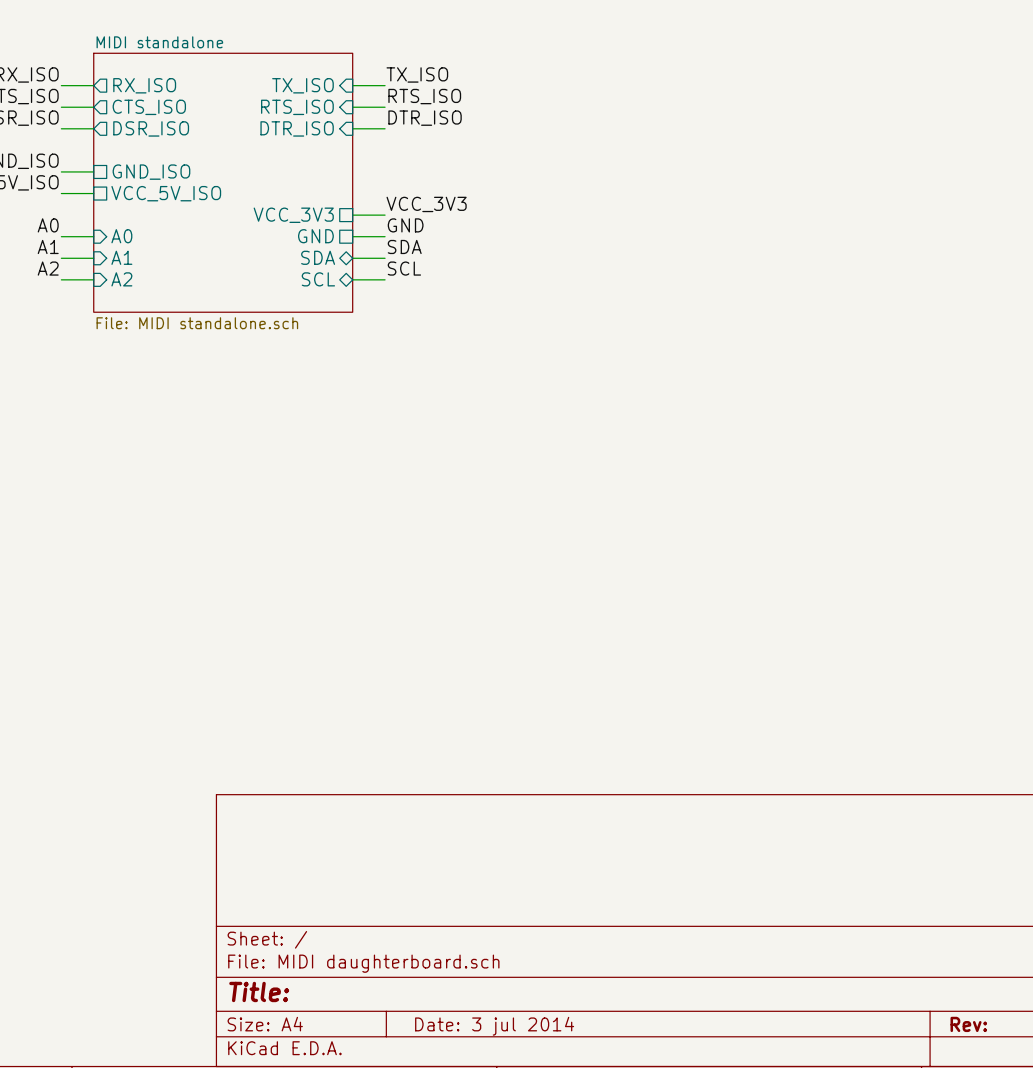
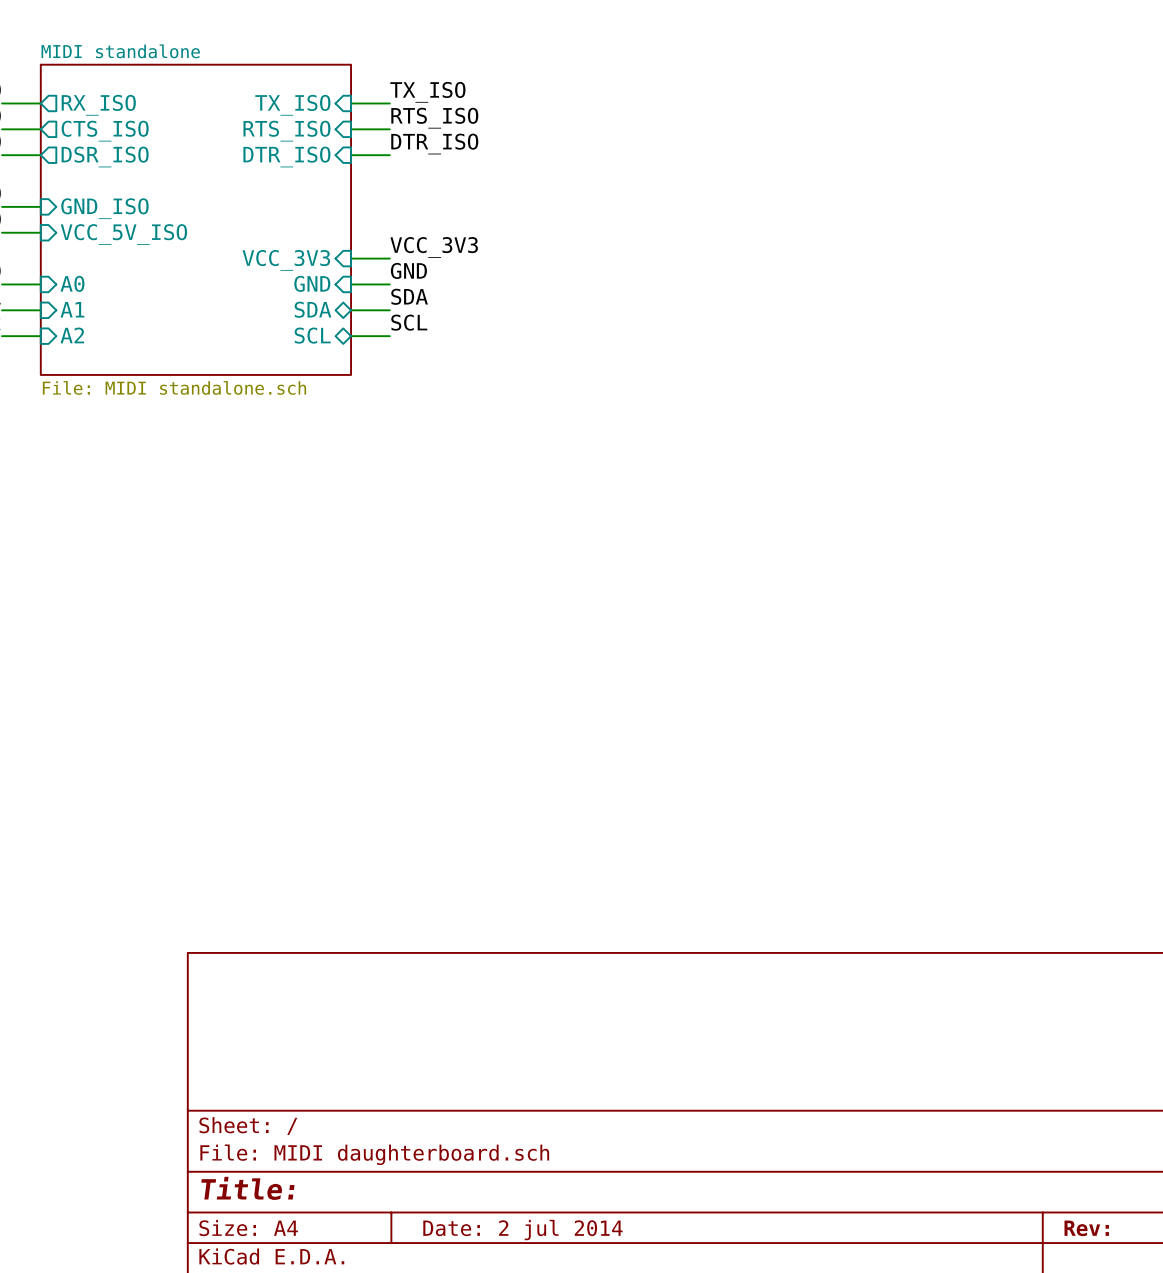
sheet pin shape: passive (151, 172) -> input (104, 208)
sheet pin shape: passive (166, 193) -> input (123, 234)
sheet pin shape: passive (293, 215) -> input (286, 260)
sheet pin shape: passive (315, 236) -> input (312, 283)
title block: Date: 3 jul 2014 (494, 1026) -> Date: 2 jul 2014 (522, 1230)

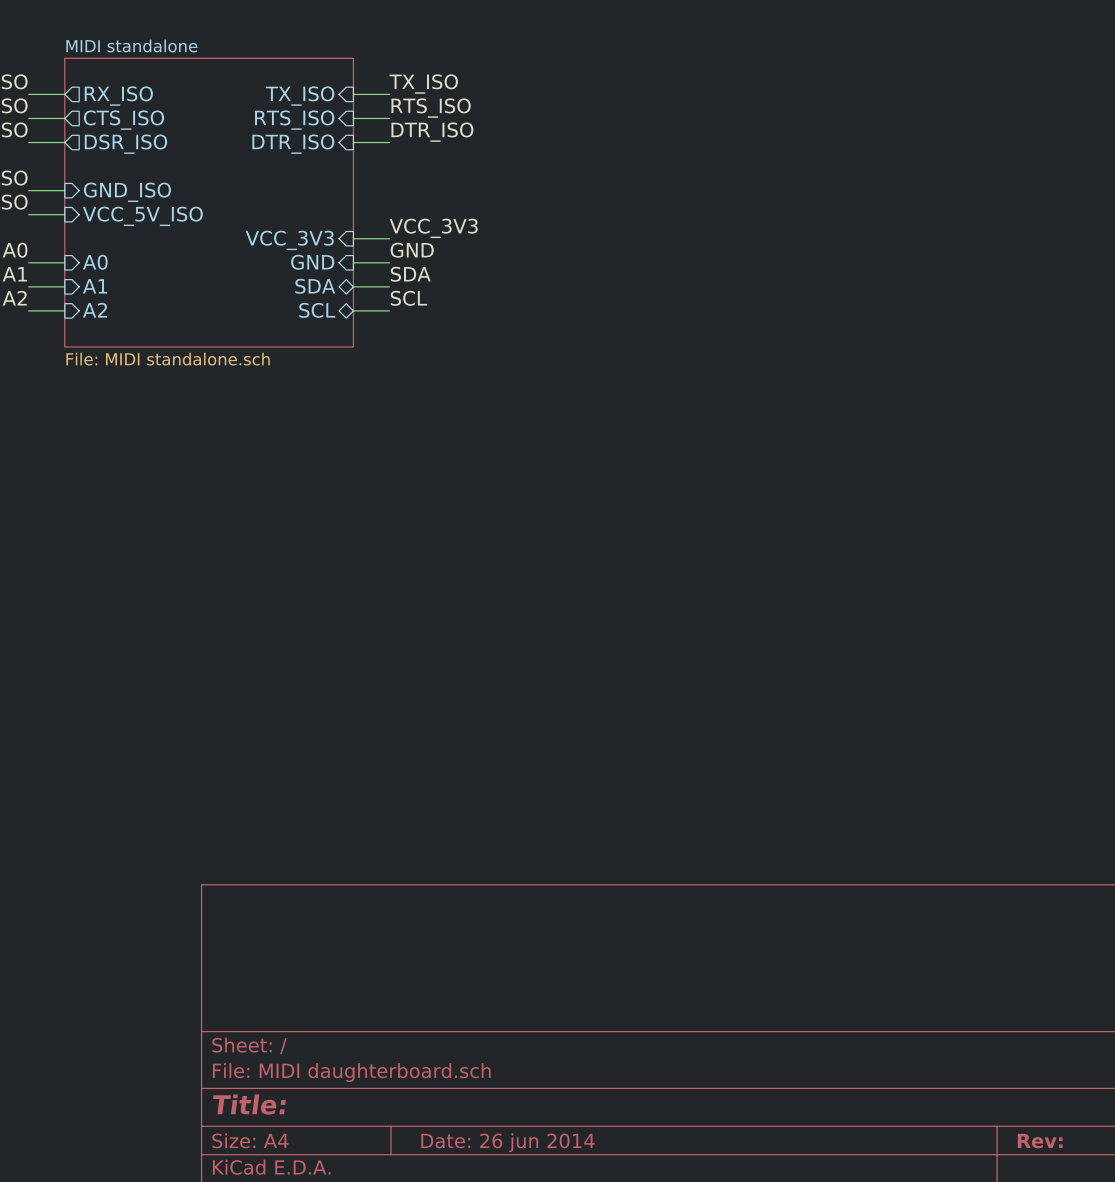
title block: Date: 2 jul 2014 (522, 1230) -> Date: 26 jun 2014 (507, 1142)

